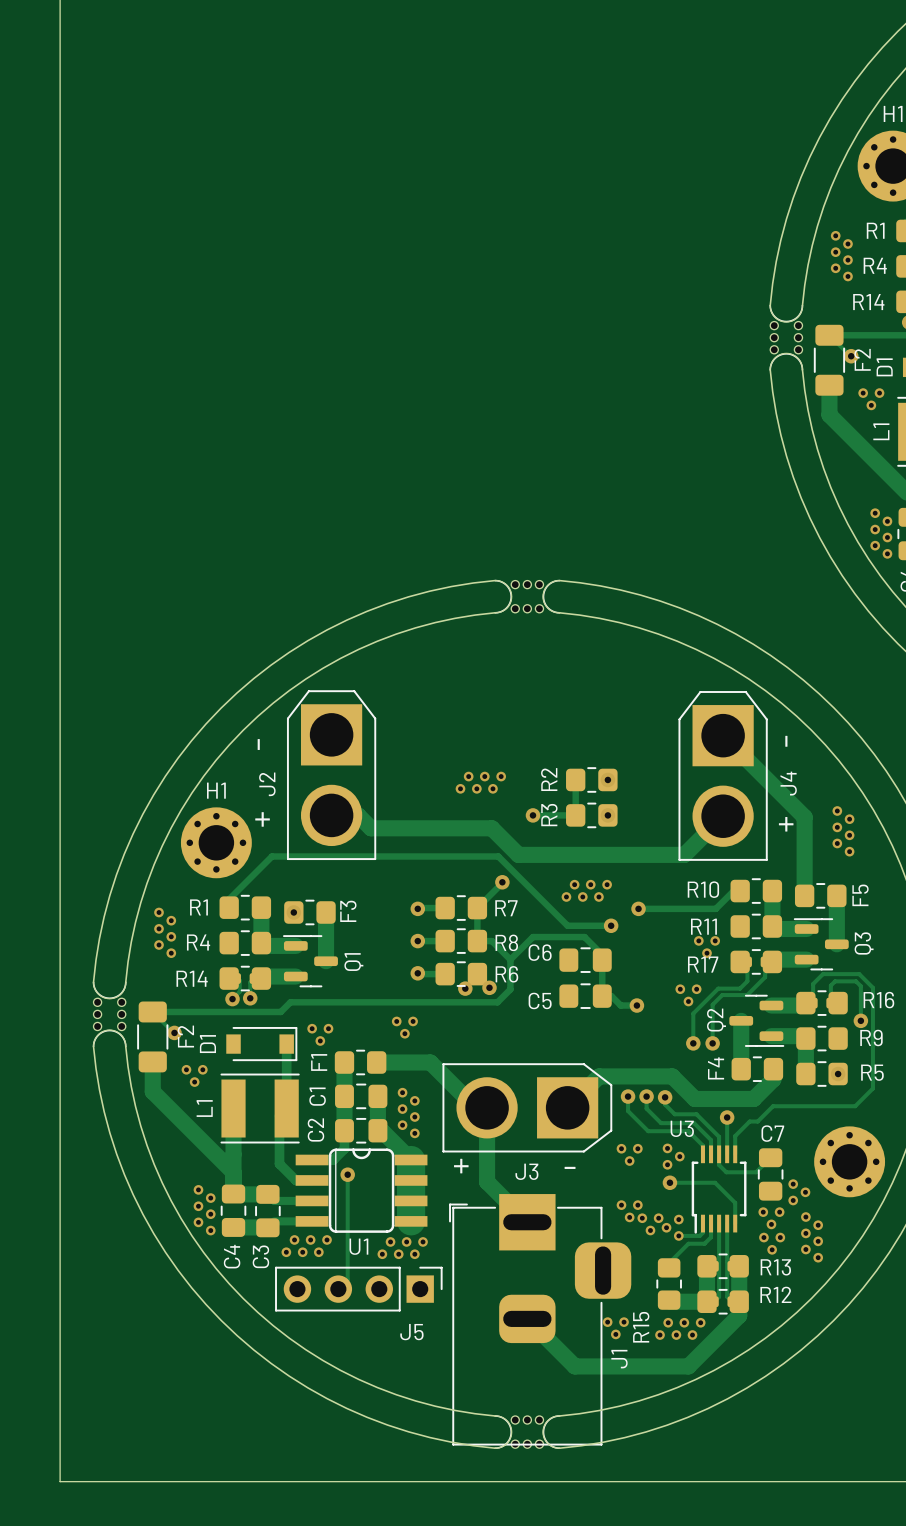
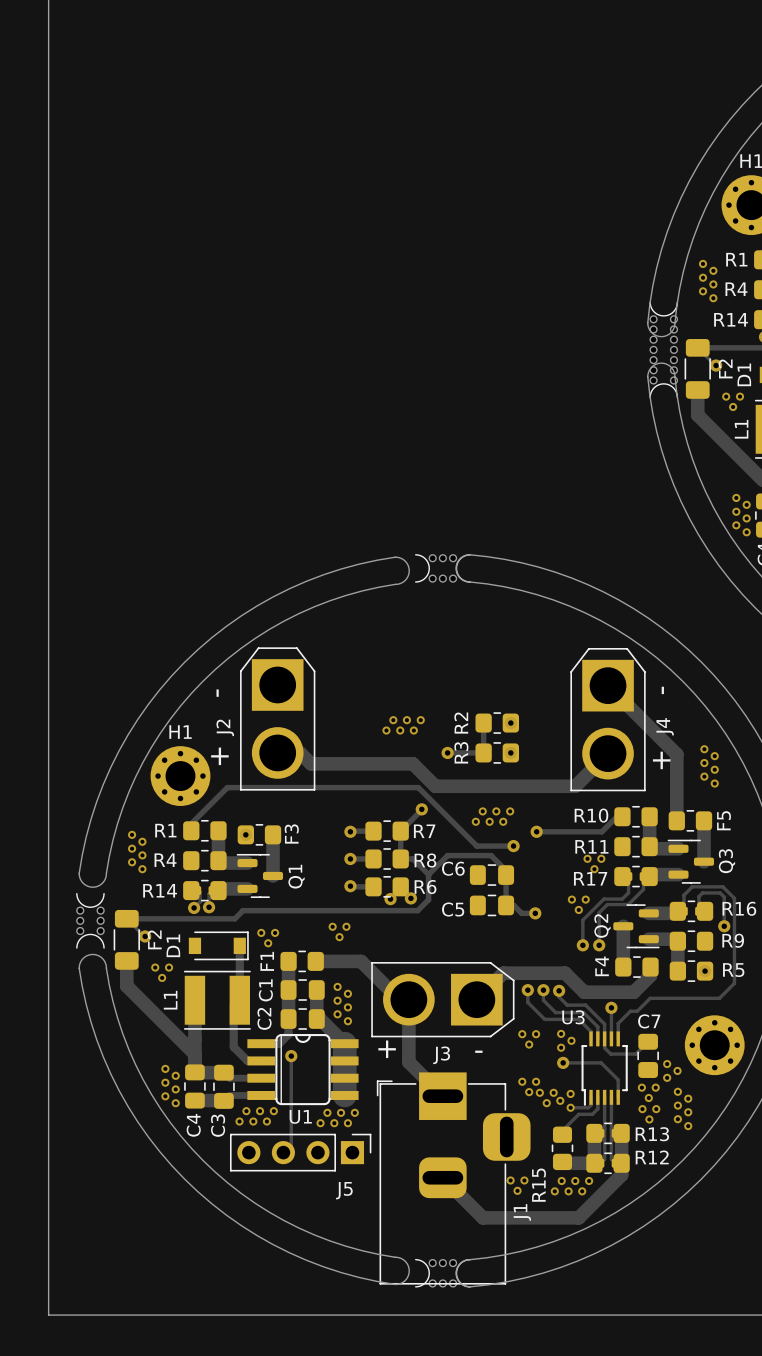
part footprint: [769, 304, 804, 371] -> [649, 301, 679, 399]
board edge: (495, 580) (429, 591) (387, 603) (346, 620) (307, 640) (271, 665) (221, 708) (191, 740) (165, 776) (142, 814) (124, 854) (109, 895) (99, 938) (93, 982) (98, 994) (111, 998) (118, 995) (124, 989) (135, 922) (147, 883) (162, 845) (181, 810) (203, 776) (243, 730) (289, 690) (323, 668) (358, 649) (415, 627) (455, 618) (504, 610) (510, 602) (511, 592) (506, 584) (495, 580) -> (395, 557) (359, 564) (323, 574) (273, 596) (226, 626) (184, 662) (148, 704) (127, 735) (110, 767) (96, 801) (86, 837) (79, 873) (83, 883) (94, 887) (104, 881) (117, 824) (135, 776) (160, 733) (180, 706) (203, 681) (228, 658) (255, 638) (298, 613) (346, 595) (403, 582) (408, 575) (408, 567) (403, 559) (395, 557)
board edge: (93, 1046) (99, 1090) (109, 1133) (133, 1194) (153, 1233) (178, 1270) (221, 1320) (253, 1350) (289, 1376) (327, 1398) (367, 1417) (408, 1431) (451, 1442) (495, 1448) (507, 1442) (511, 1436) (511, 1428) (502, 1417) (435, 1406) (396, 1394) (358, 1379) (323, 1360) (289, 1338) (243, 1298) (216, 1268) (191, 1235) (162, 1182) (140, 1126) (131, 1086) (123, 1037) (115, 1031) (103, 1031) (96, 1037) (93, 1046) -> (79, 968) (81, 960) (87, 955) (97, 955) (104, 960) (117, 1017) (135, 1064) (160, 1108) (180, 1135) (203, 1160) (241, 1193) (269, 1212) (298, 1228) (346, 1246) (403, 1259) (409, 1269) (405, 1280) (395, 1284) (359, 1277) (323, 1266) (289, 1252) (241, 1225) (211, 1203) (184, 1179) (148, 1137) (128, 1106) (110, 1074) (91, 1022) (79, 968)

